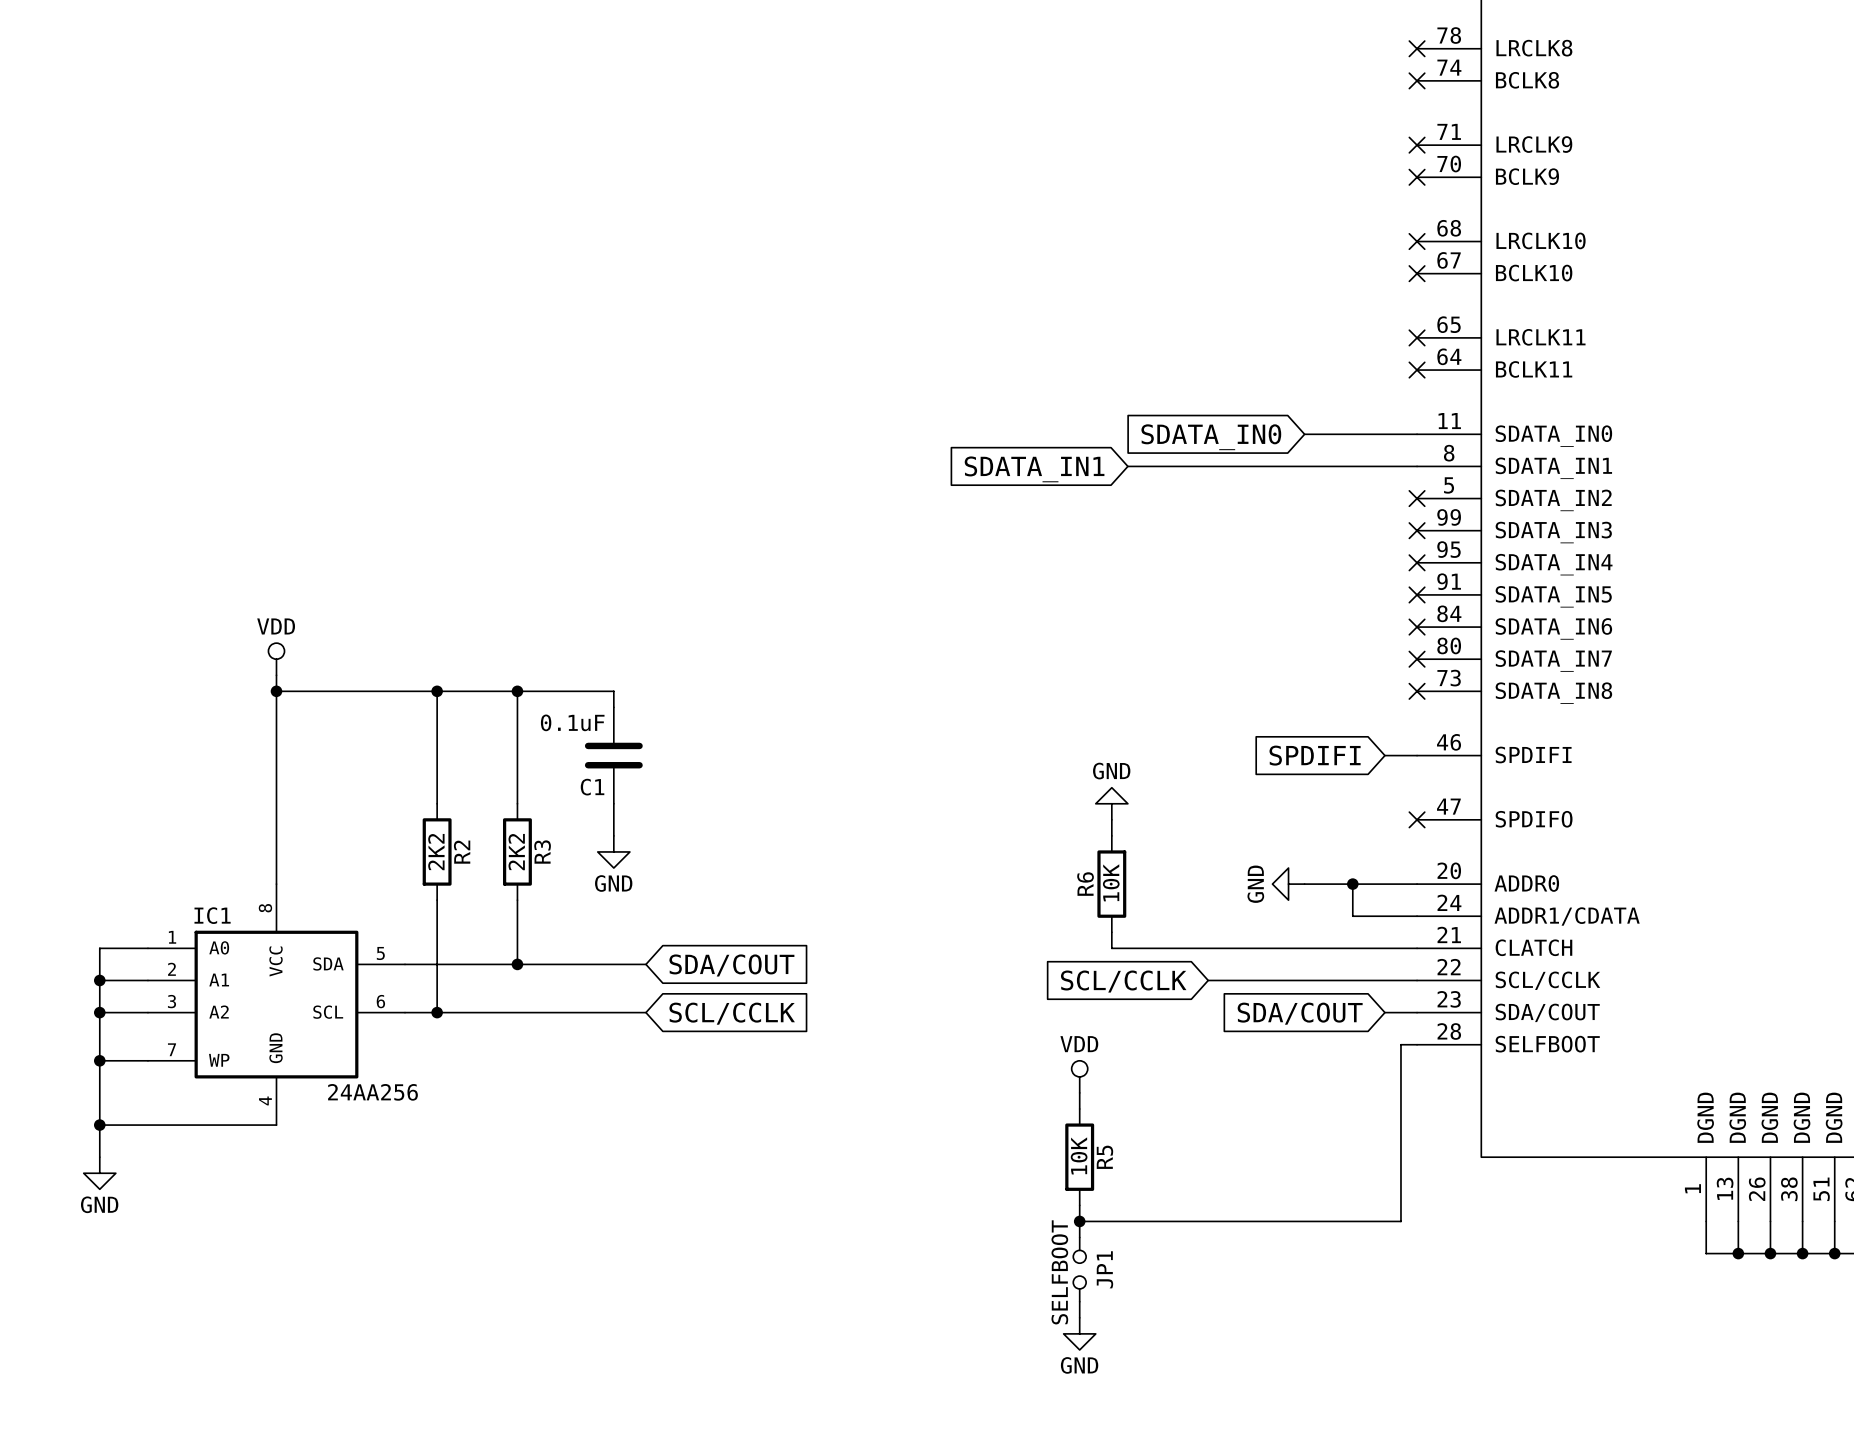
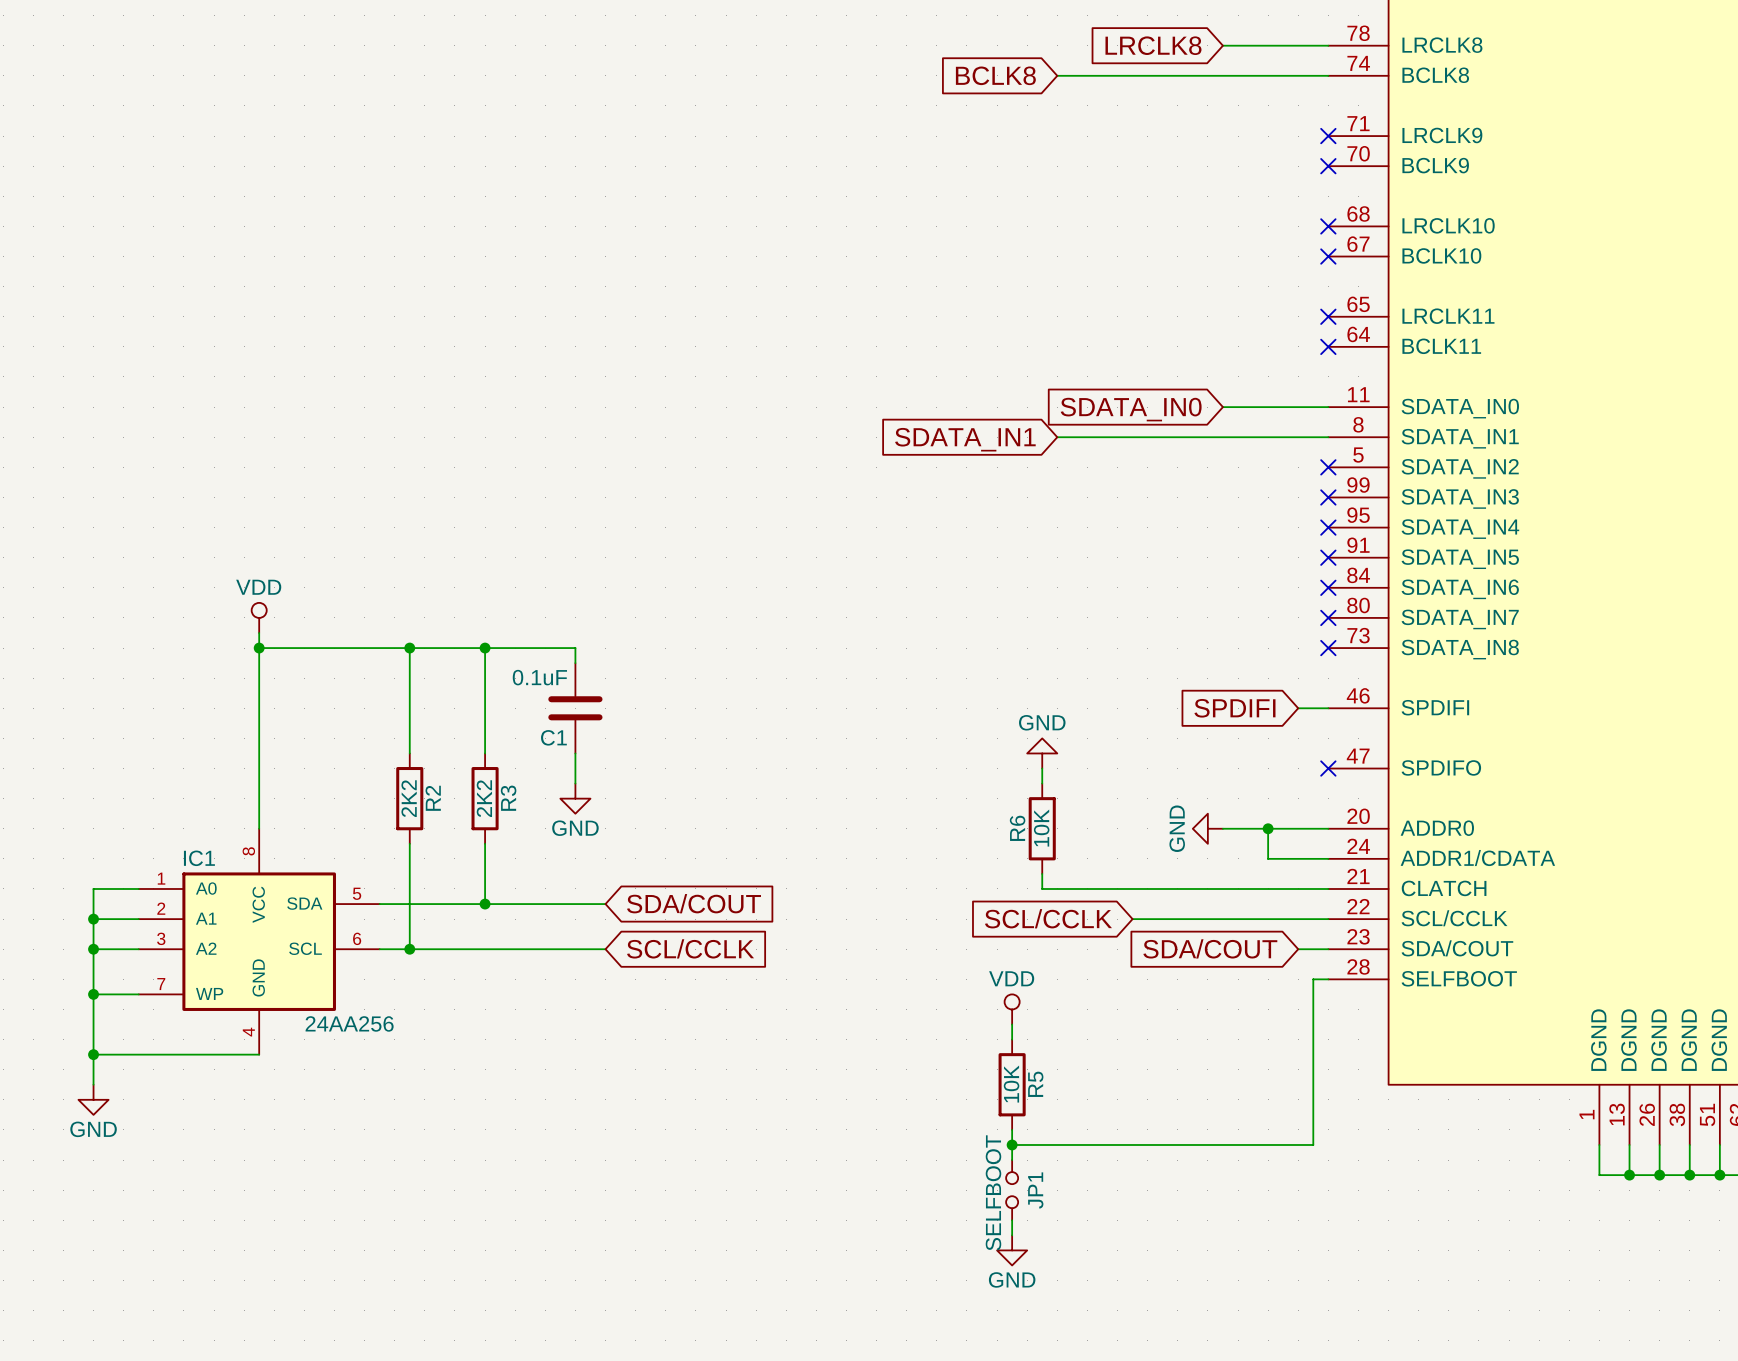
global label: none -> LRCLK8 (1153, 45)
wire: none -> (1222, 45) (1328, 45)
no-connect mark: (1417, 48) -> none
global label: none -> BCLK8 (995, 75)
wire: none -> (1057, 75) (1328, 75)
no-connect mark: (1417, 80) -> none

